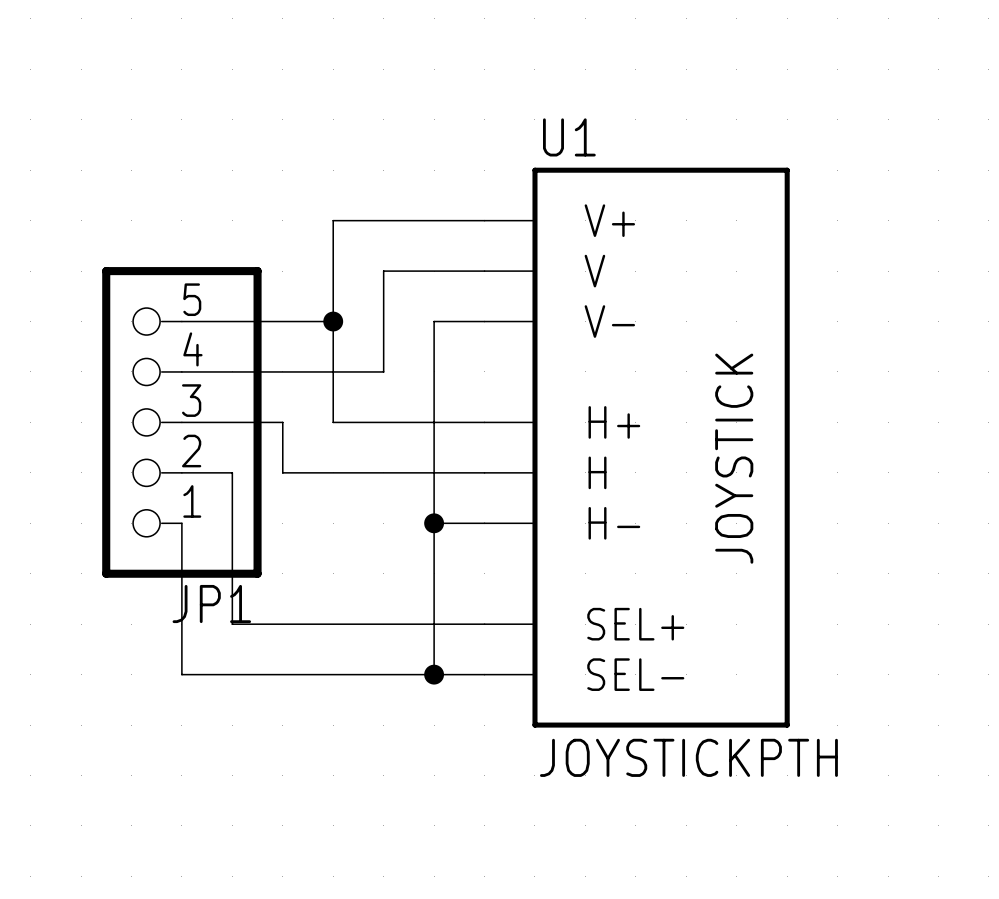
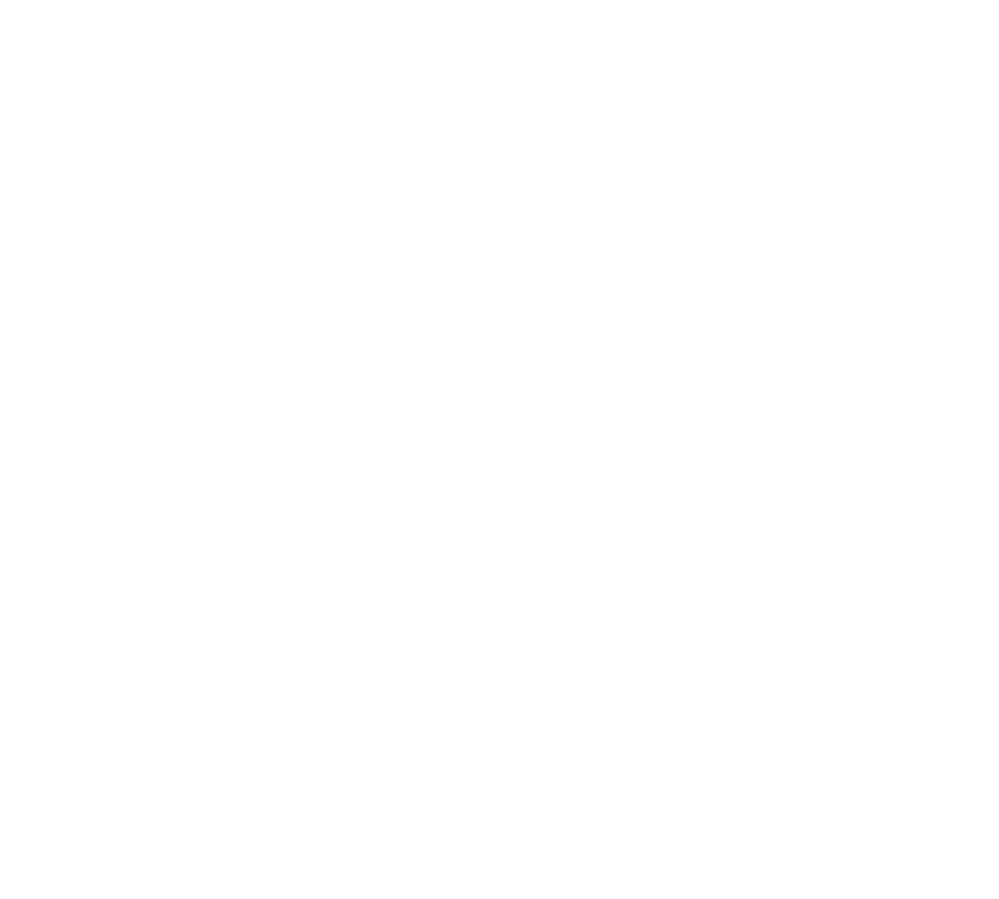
wire: (484, 220) (333, 220) (333, 422) (484, 422) -> none
wire: (484, 271) (383, 271) (383, 371) (181, 371) -> none
wire: (181, 321) (333, 321) -> none
junction: (333, 321) -> none
wire: (484, 321) (434, 321) (434, 674) -> none
wire: (181, 422) (282, 422) (282, 472) (484, 472) -> none
JP1: (181, 422) -> none
U1: JOYSTICKPTH (637, 447) -> none
wire: (181, 472) (232, 472) (232, 624) (484, 624) -> none
wire: (181, 523) (181, 674) (484, 674) -> none
wire: (434, 523) (484, 523) -> none
junction: (434, 523) -> none
junction: (434, 674) -> none

